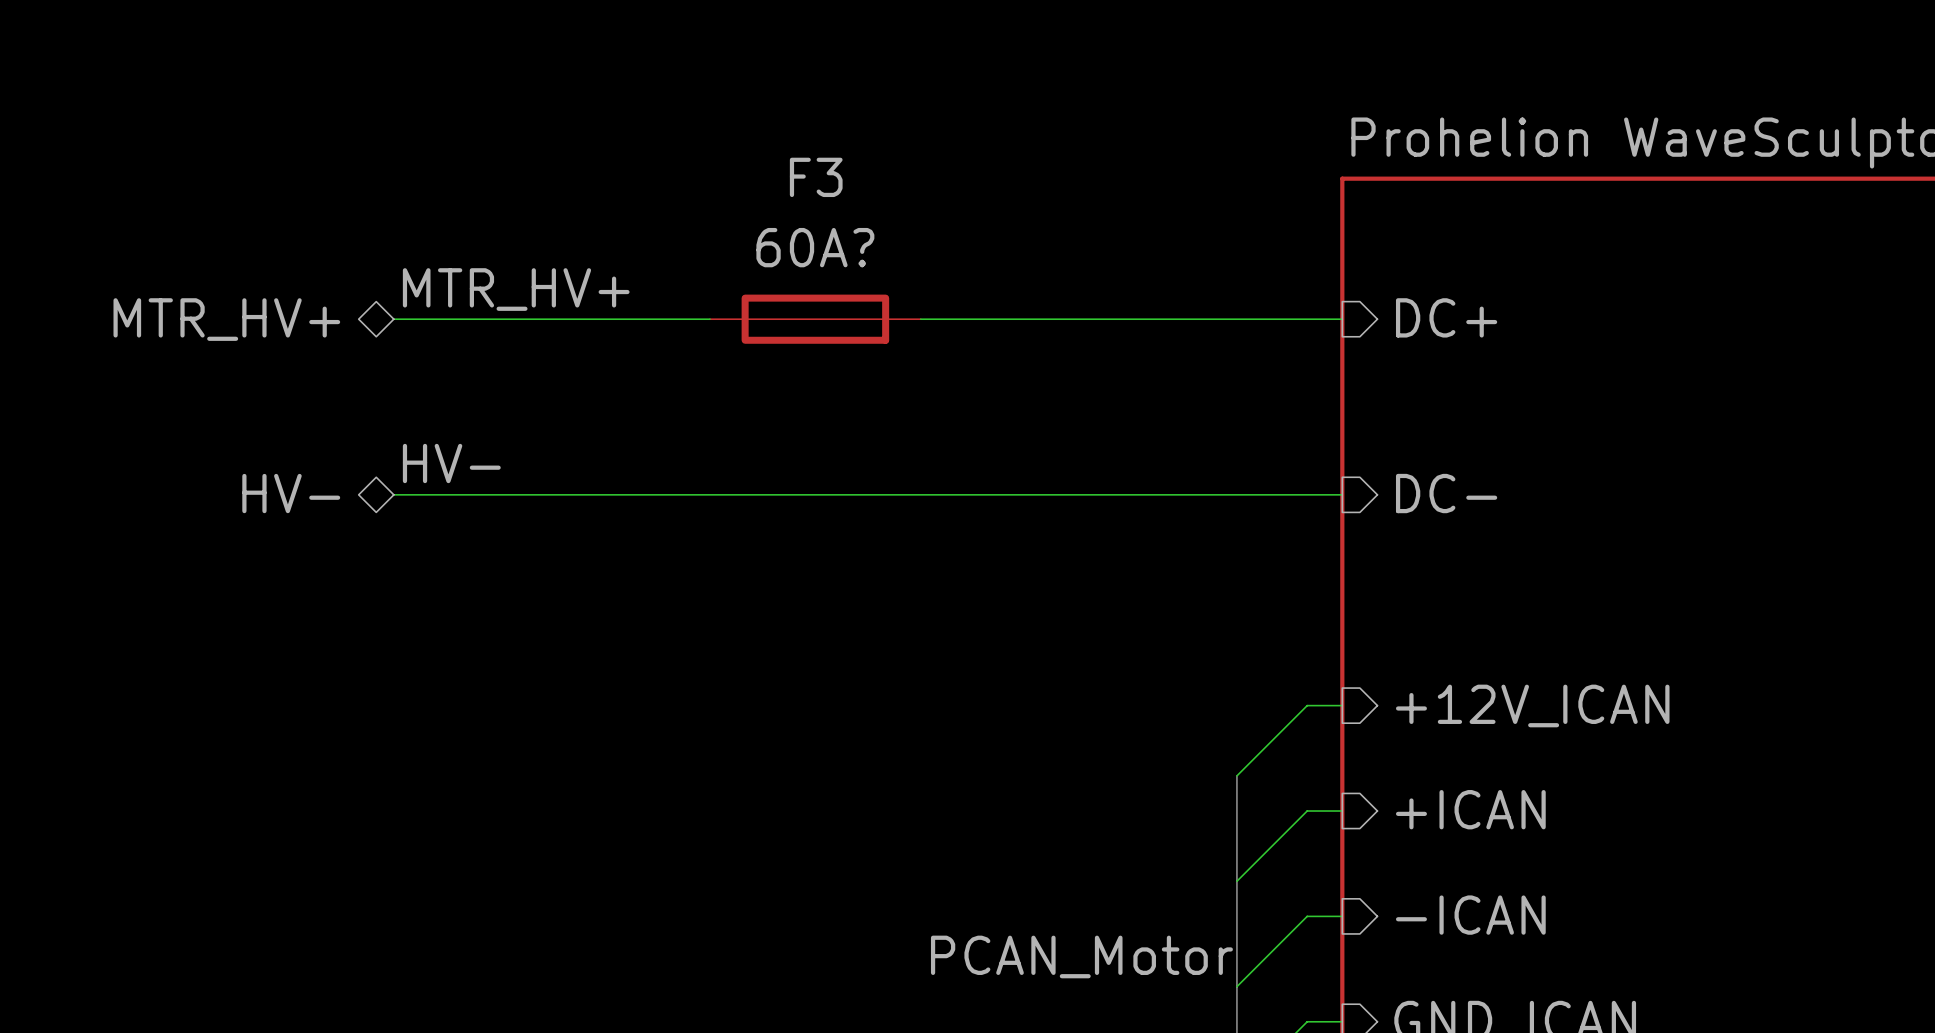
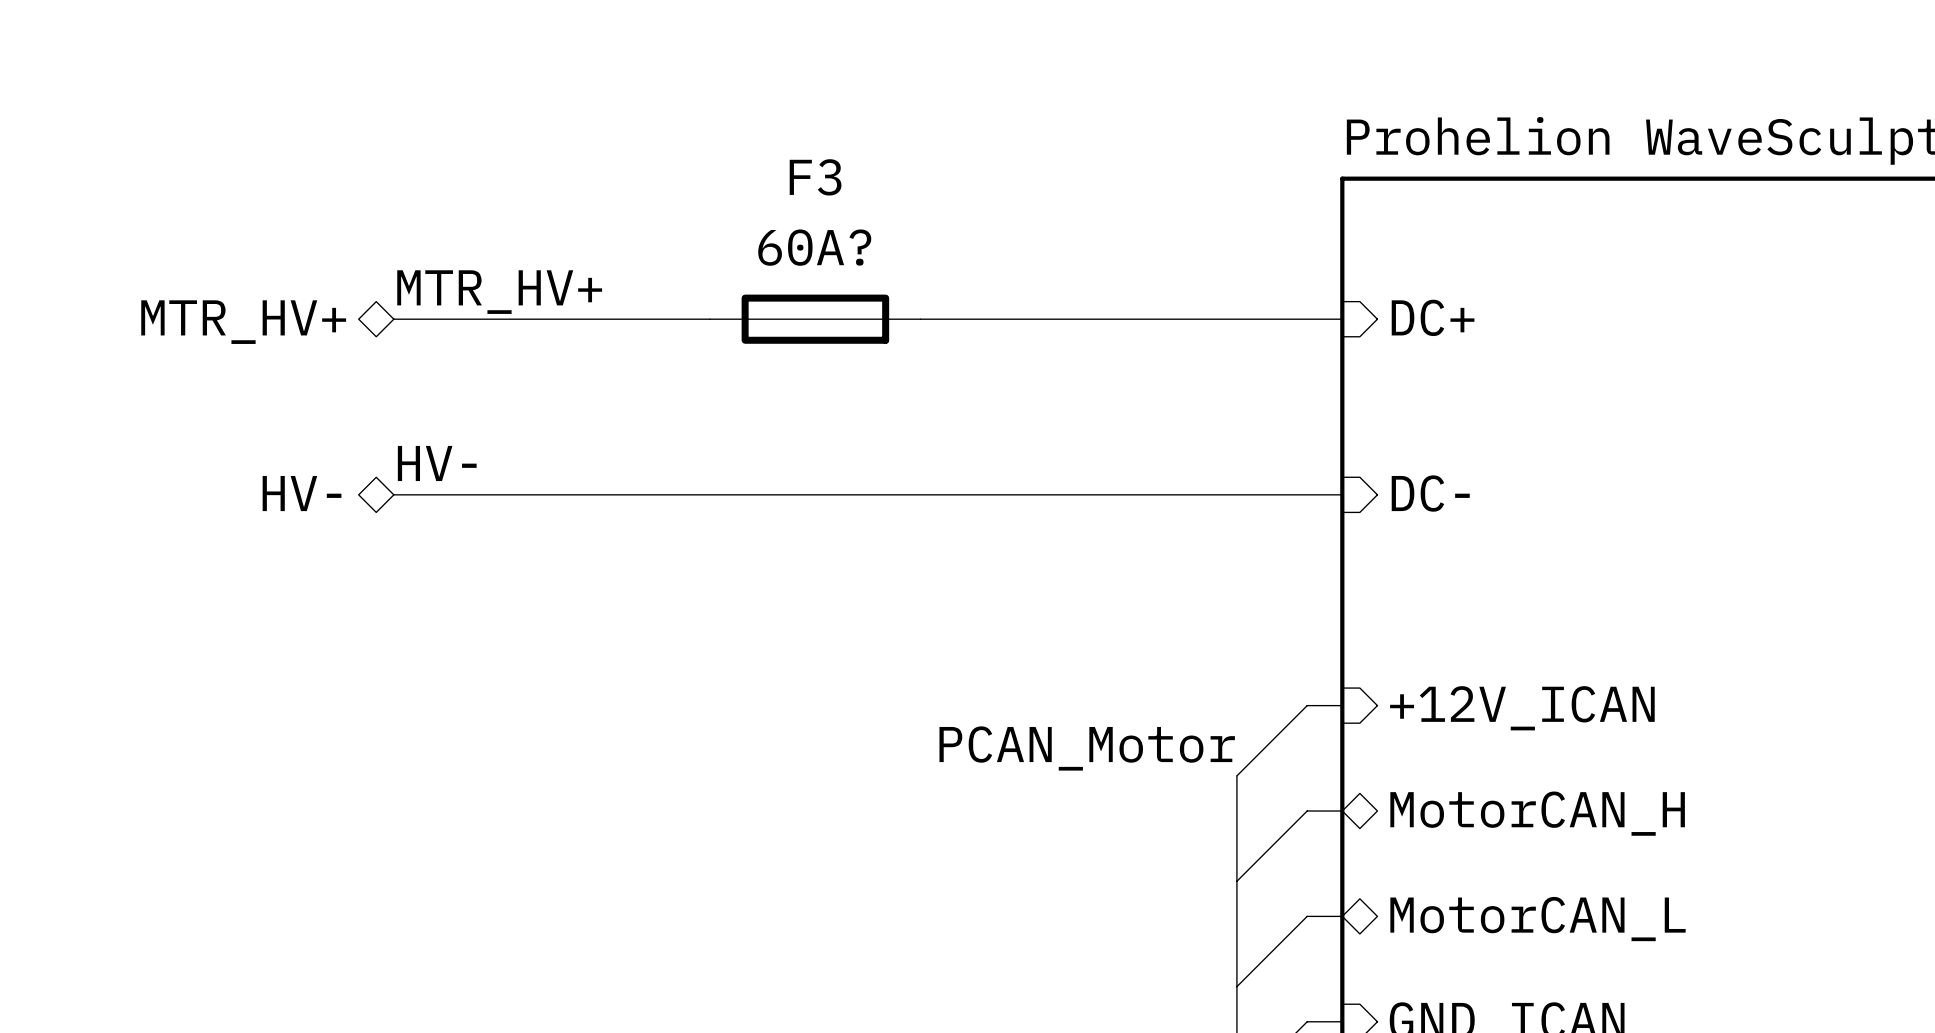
sheet pin shape: input (1470, 809) -> bidirectional (1537, 813)
sheet pin: +ICAN (1470, 809) -> MotorCAN_H (1537, 813)
sheet pin shape: input (1470, 915) -> bidirectional (1538, 919)
sheet pin: -ICAN (1470, 915) -> MotorCAN_L (1538, 919)
label position: PCAN_Motor (1081, 956) -> PCAN_Motor (1087, 748)

